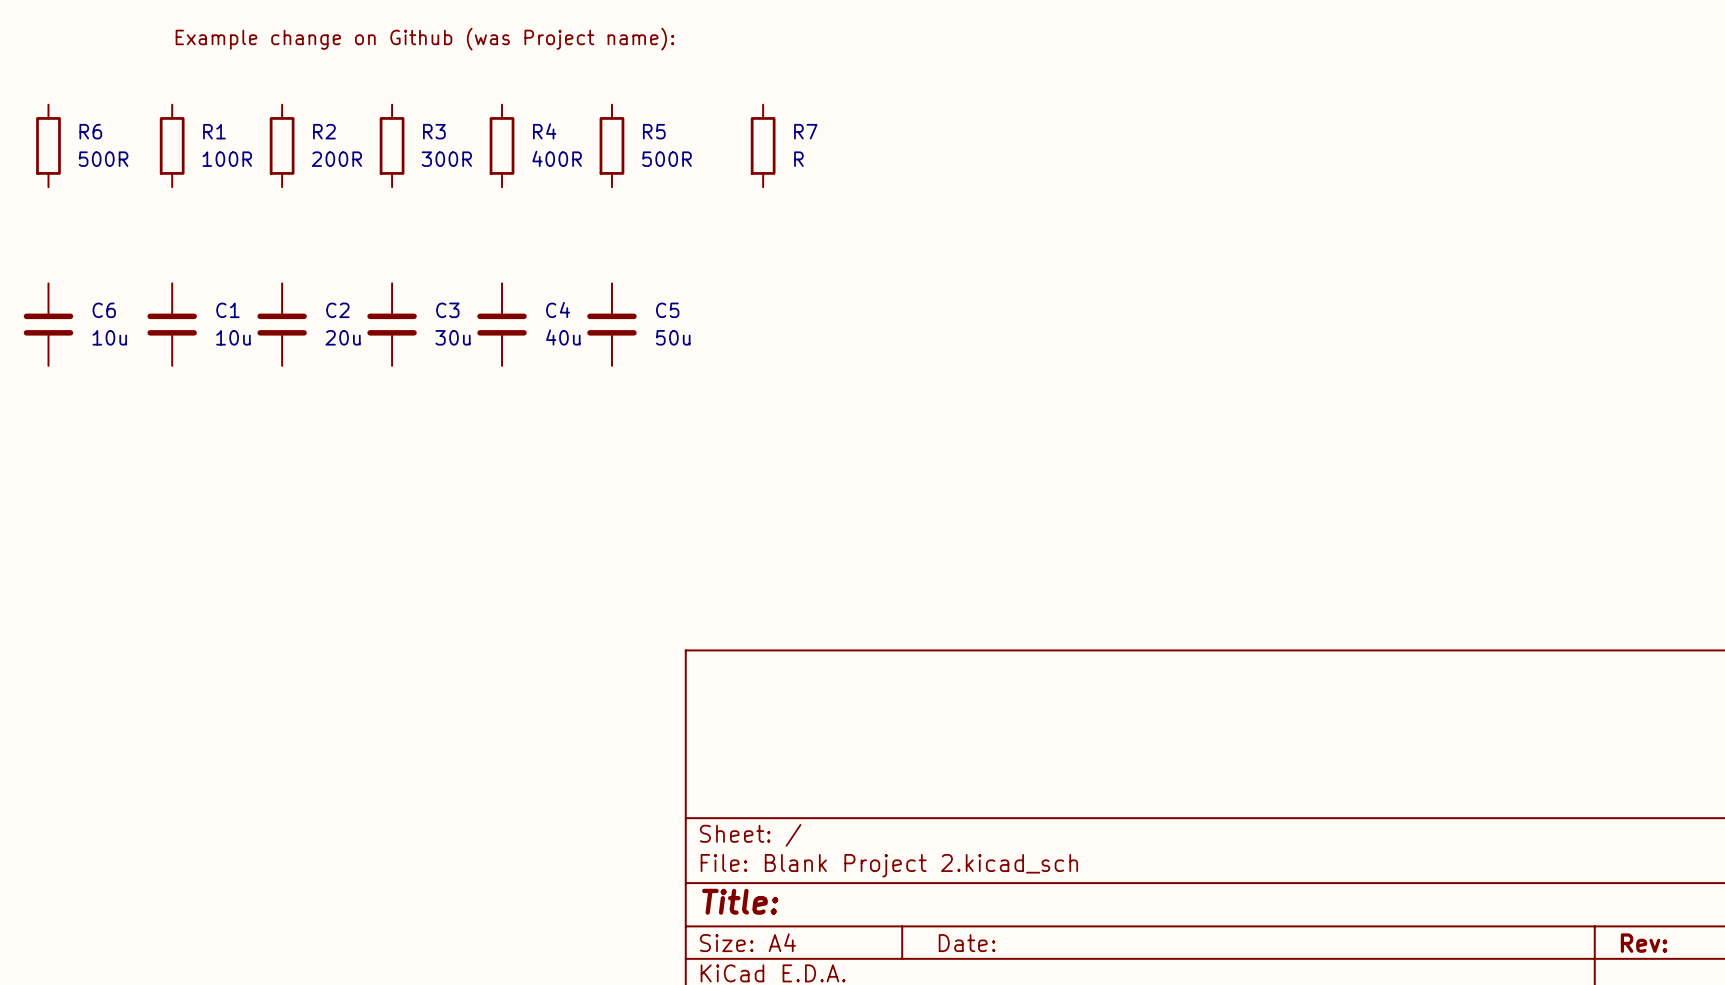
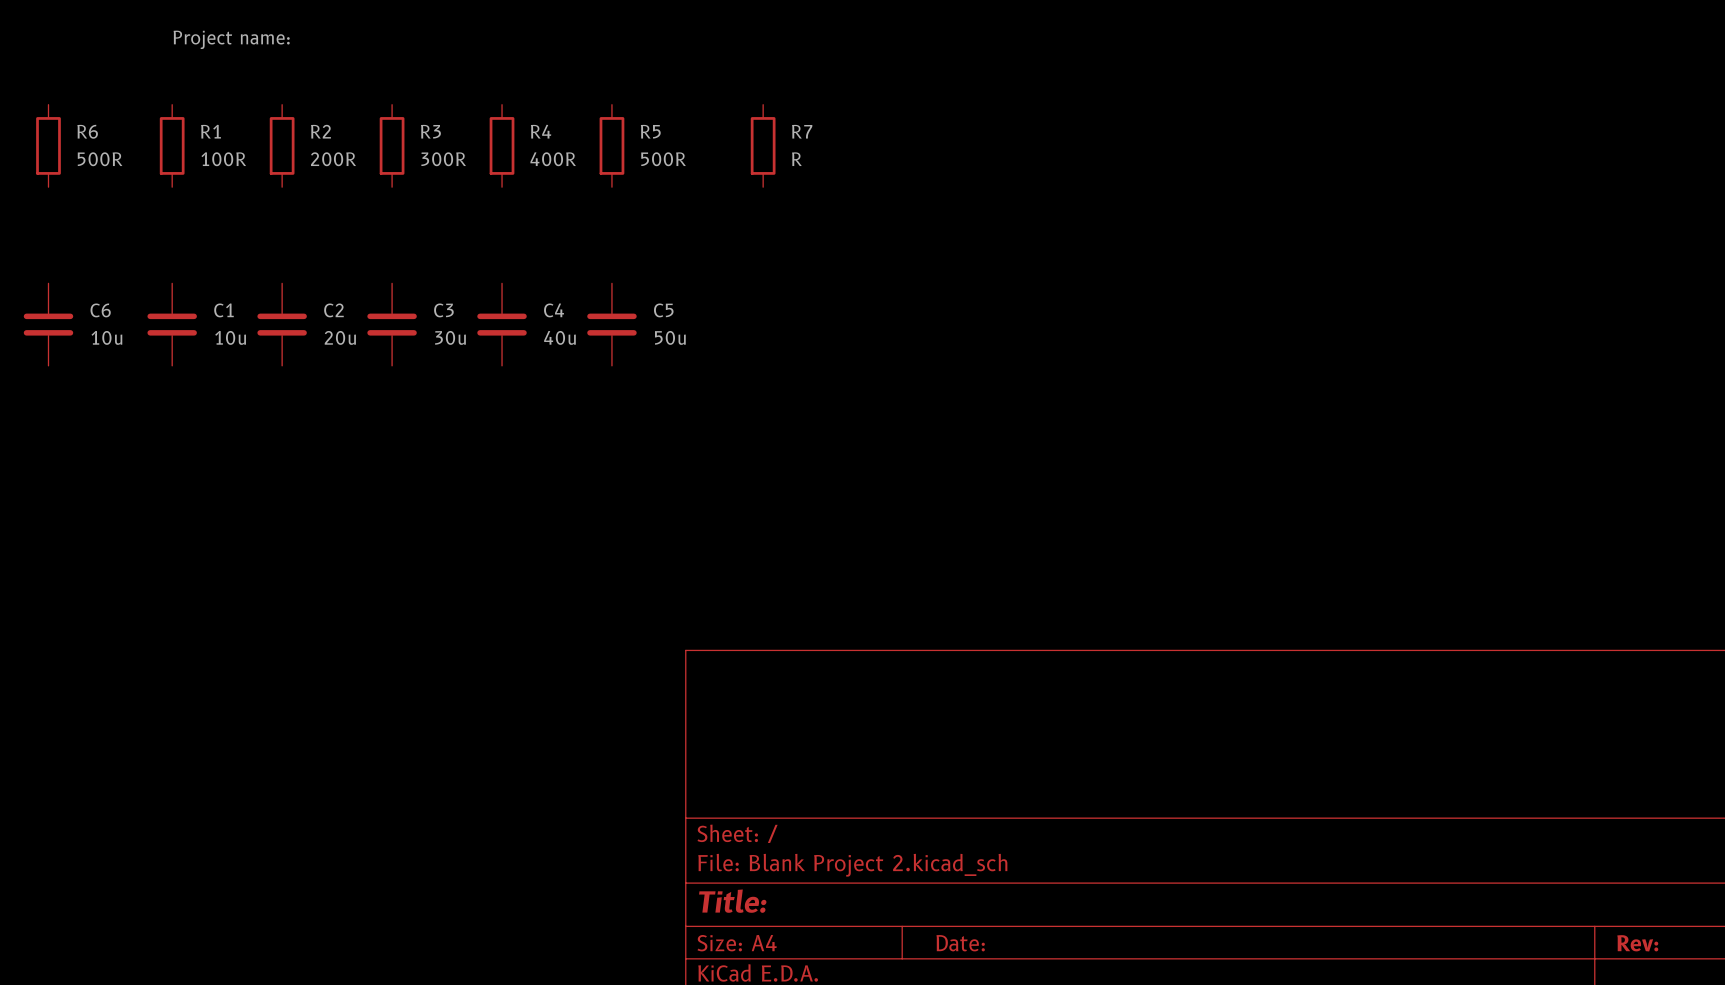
label: Example change on Github (was Project name): (424, 39) -> Project name: (231, 39)

